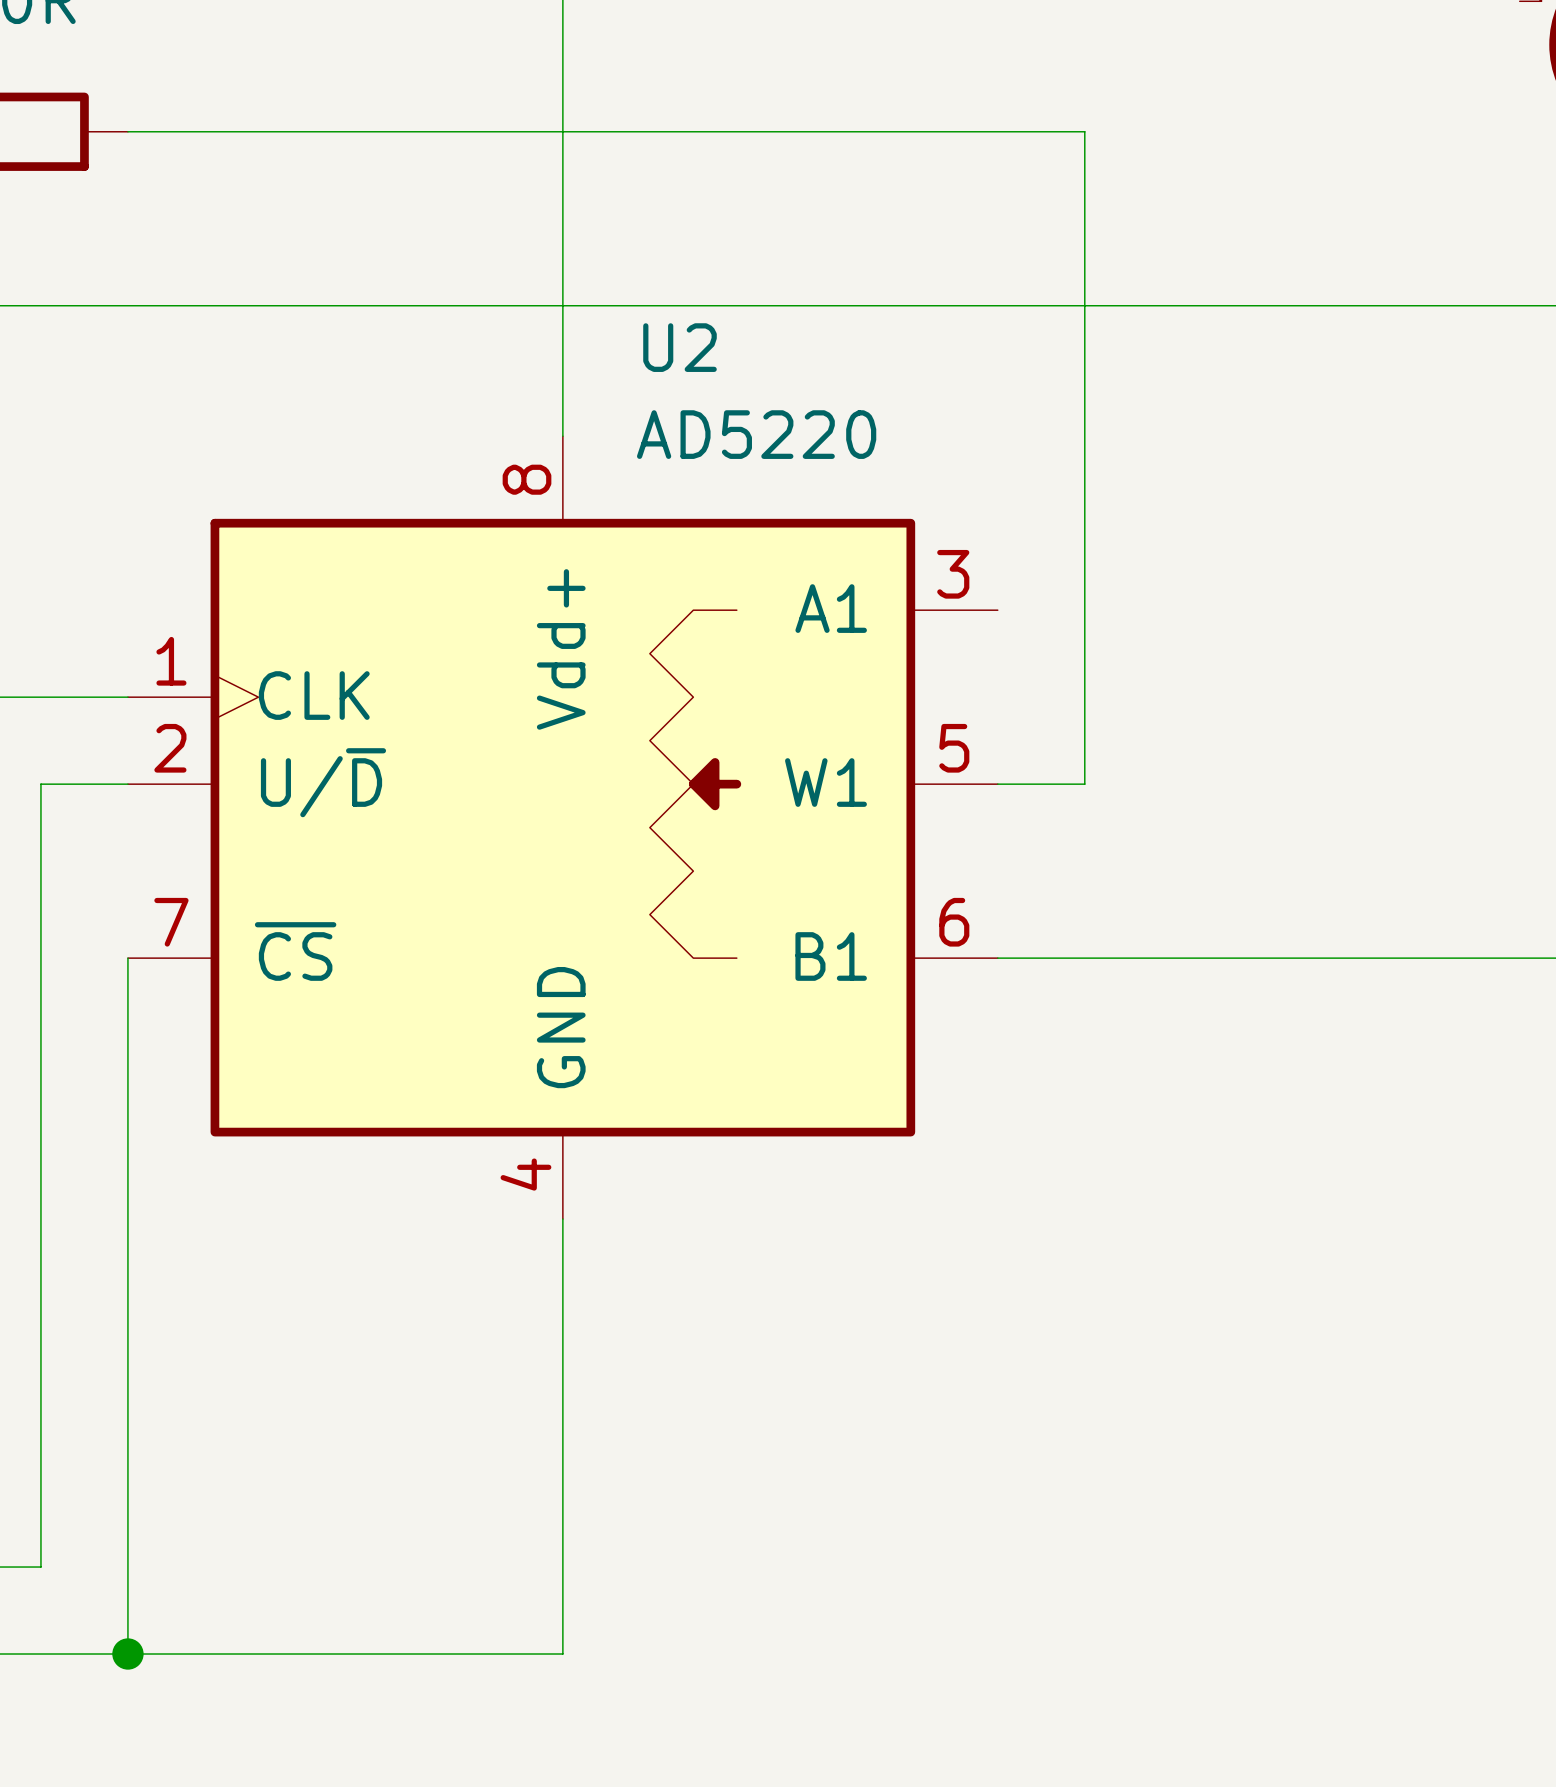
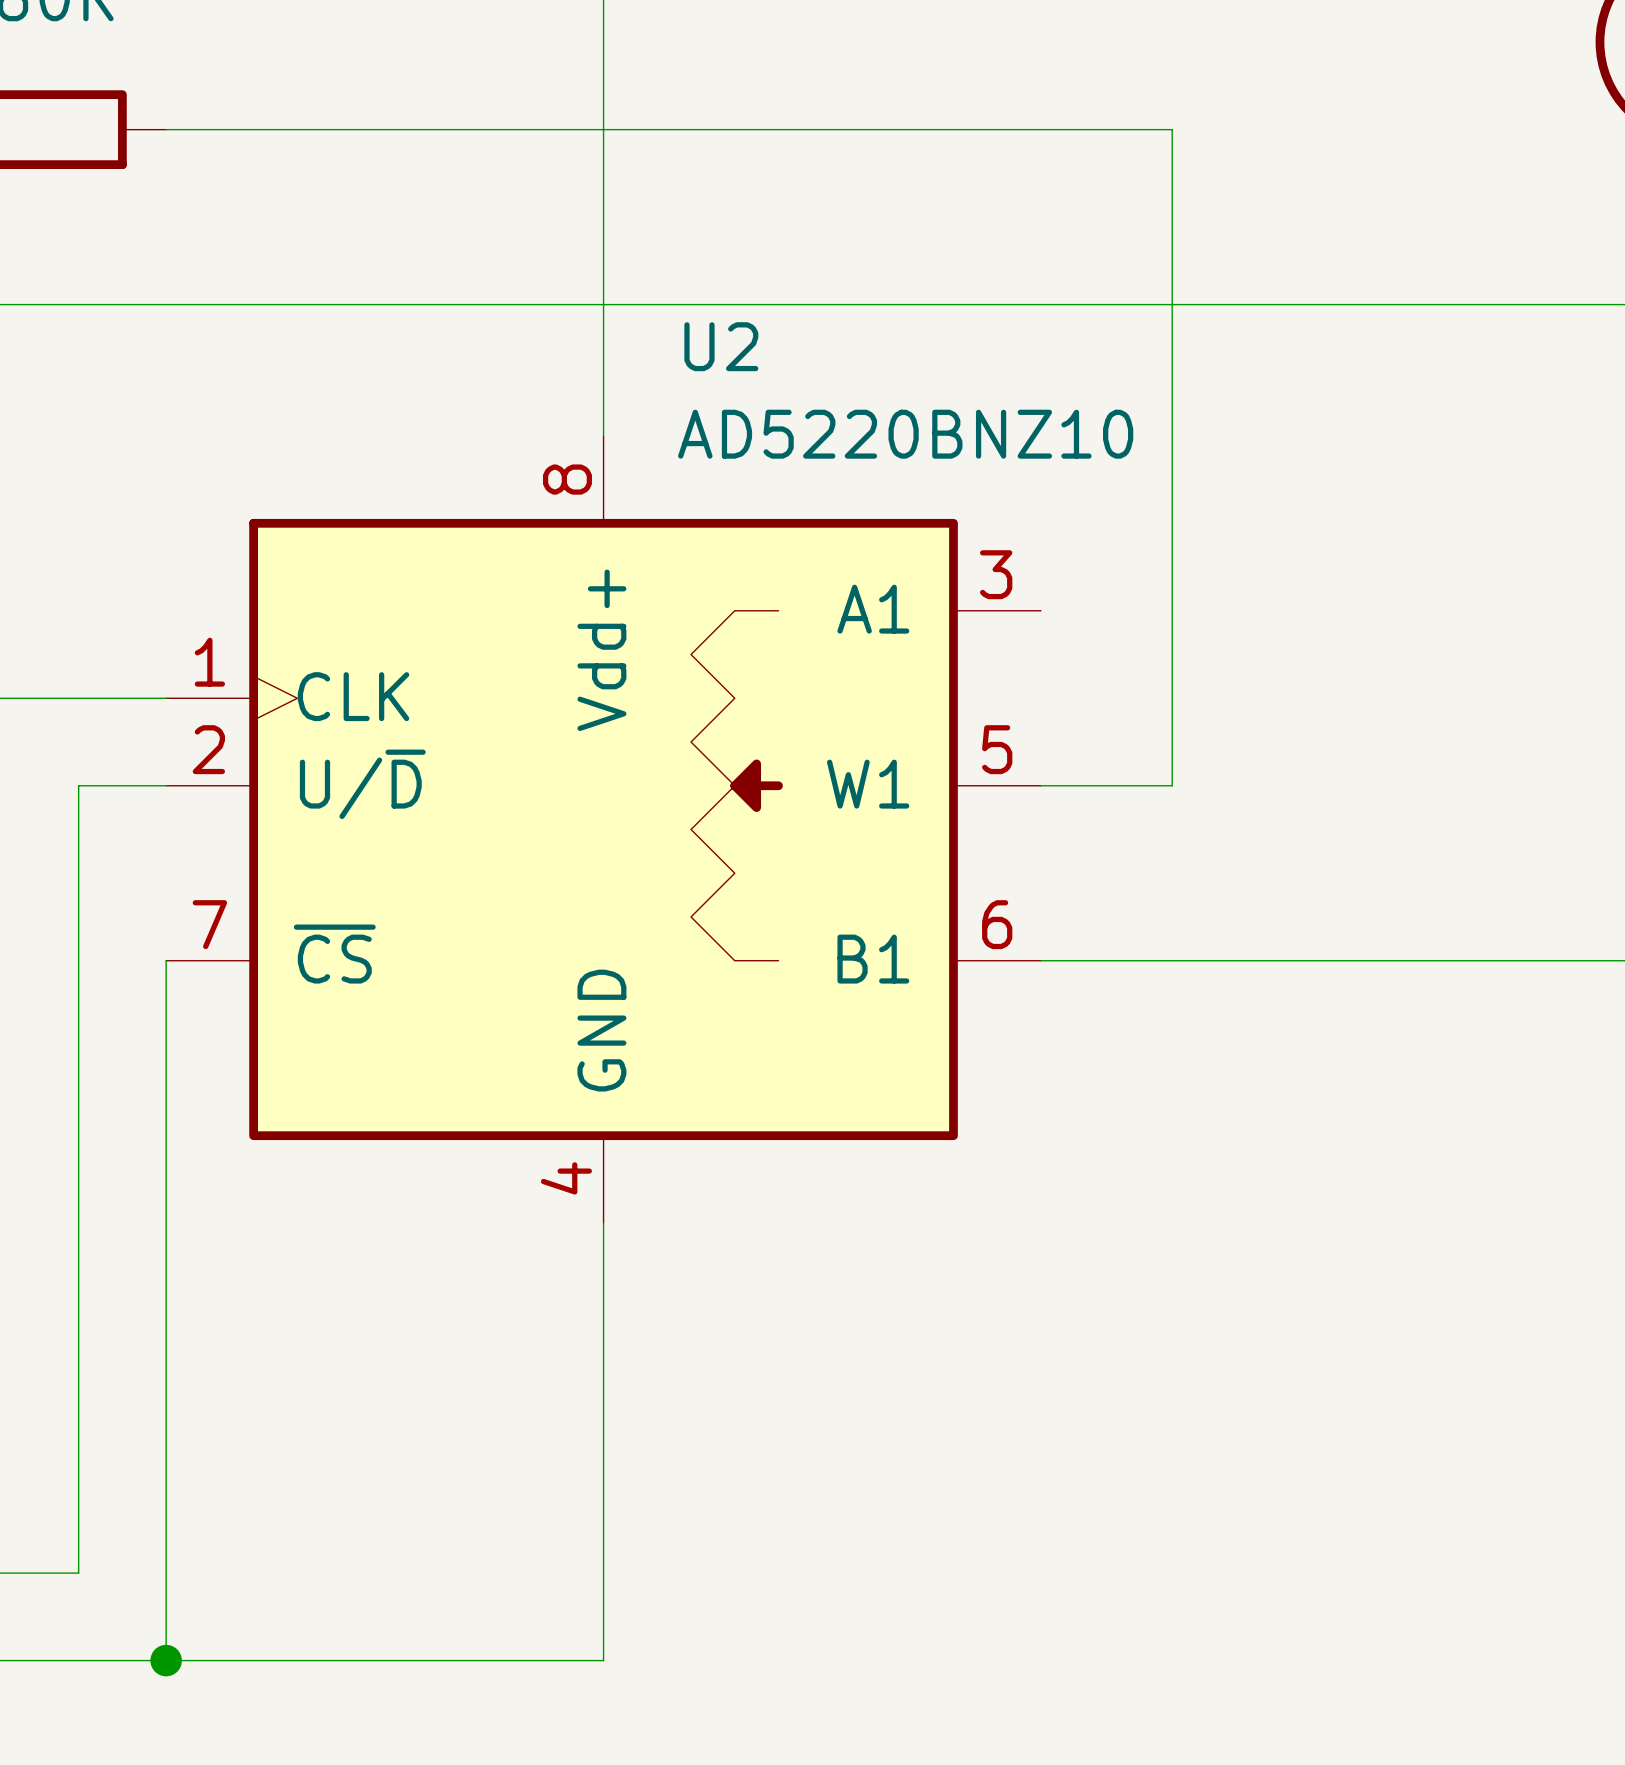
wire: (1084, 131) (1084, 784) -> (1128, 129) (1172, 129) (1172, 785) (1128, 785)
U2 value: AD5220 (756, 434) -> AD5220BNZ10 (905, 434)

